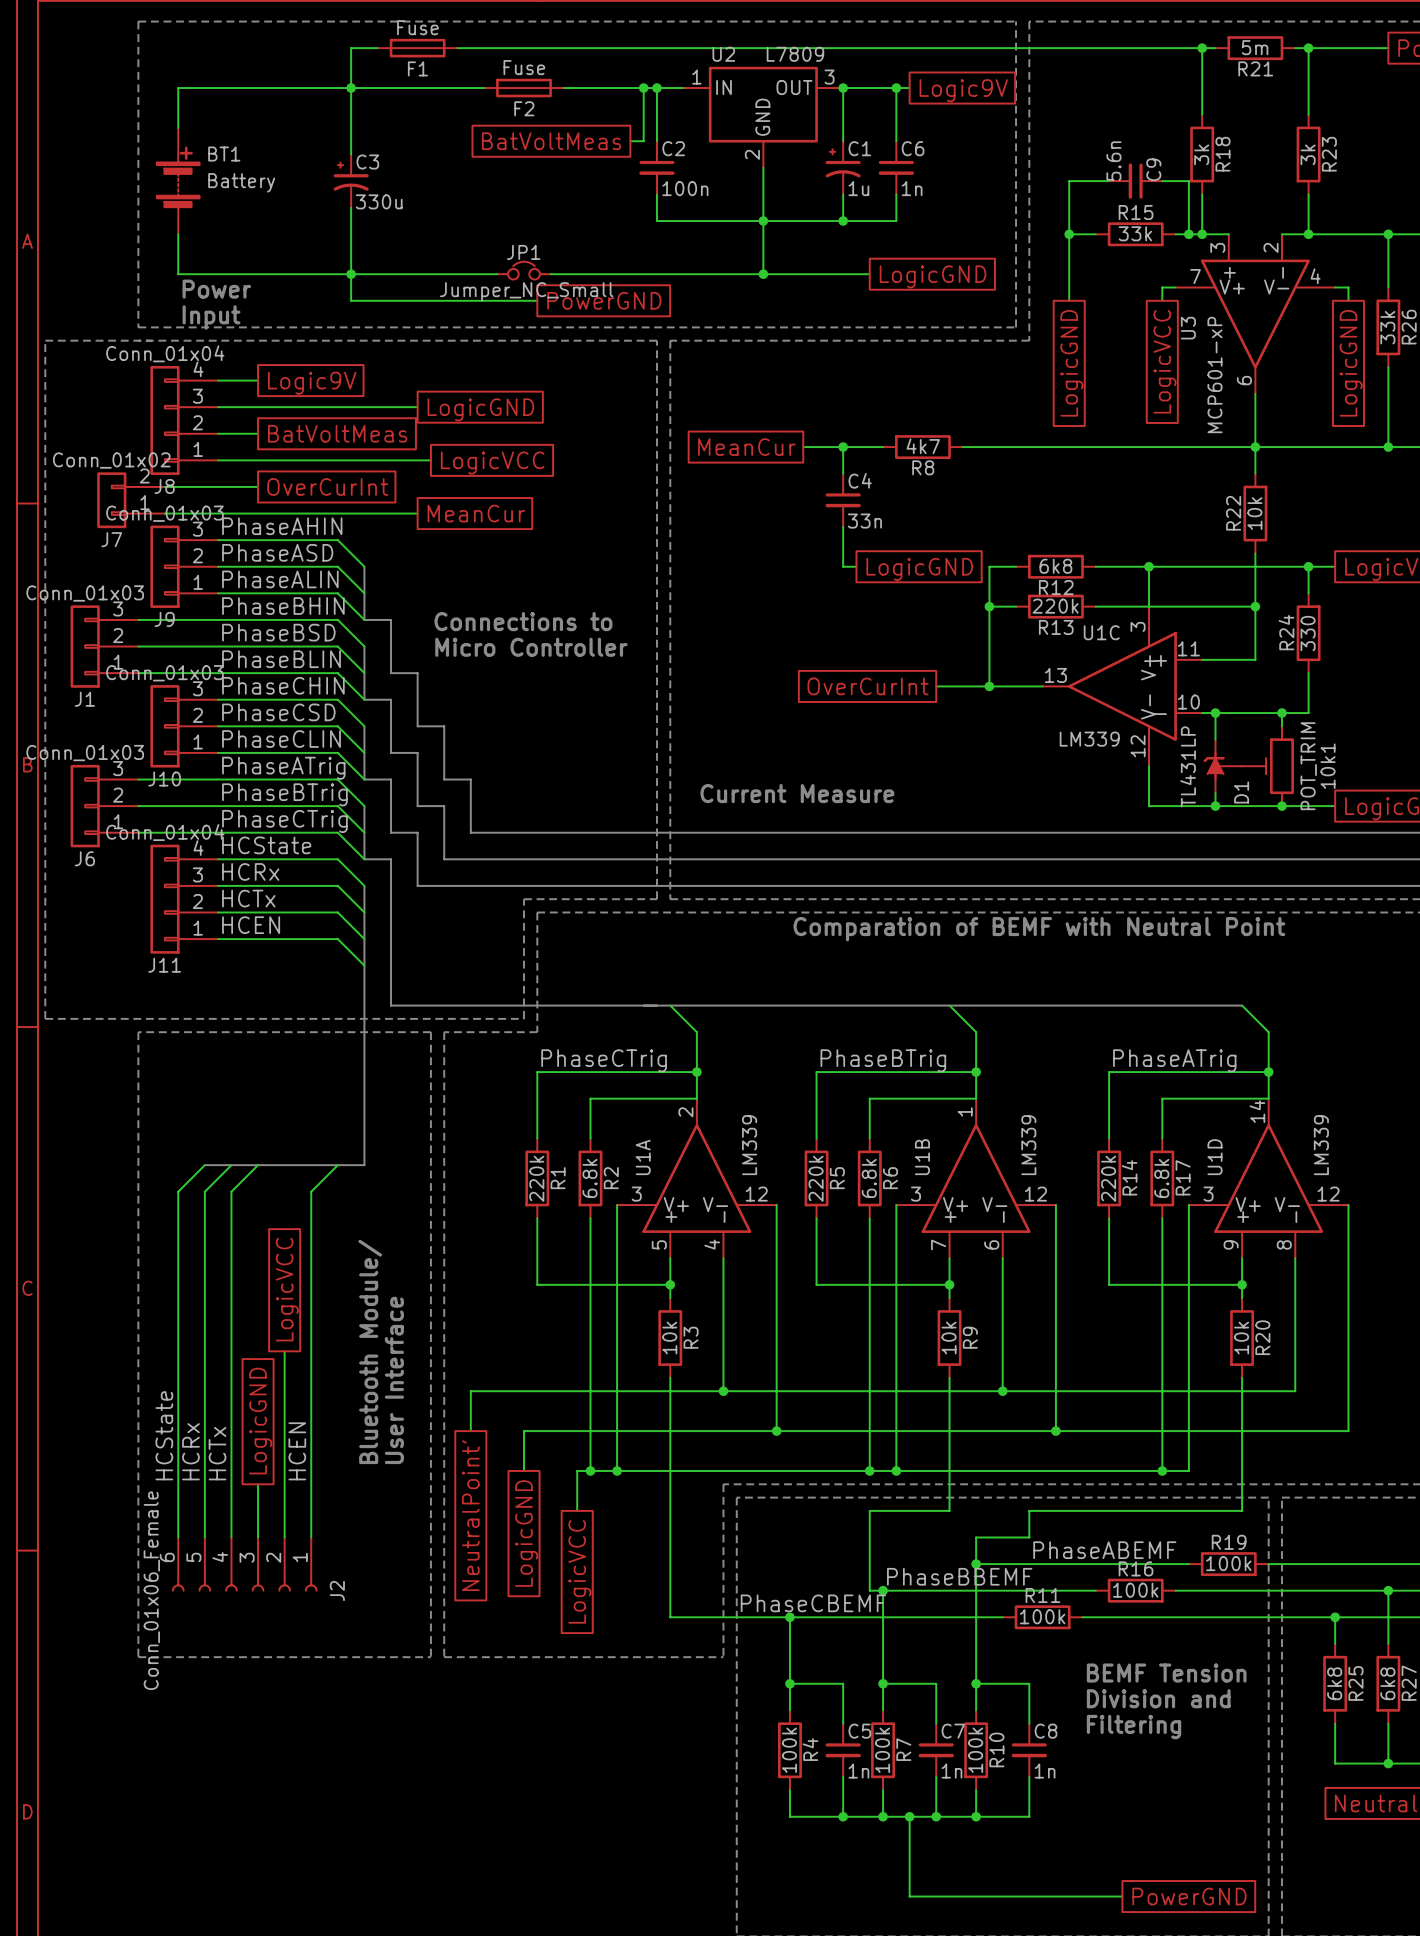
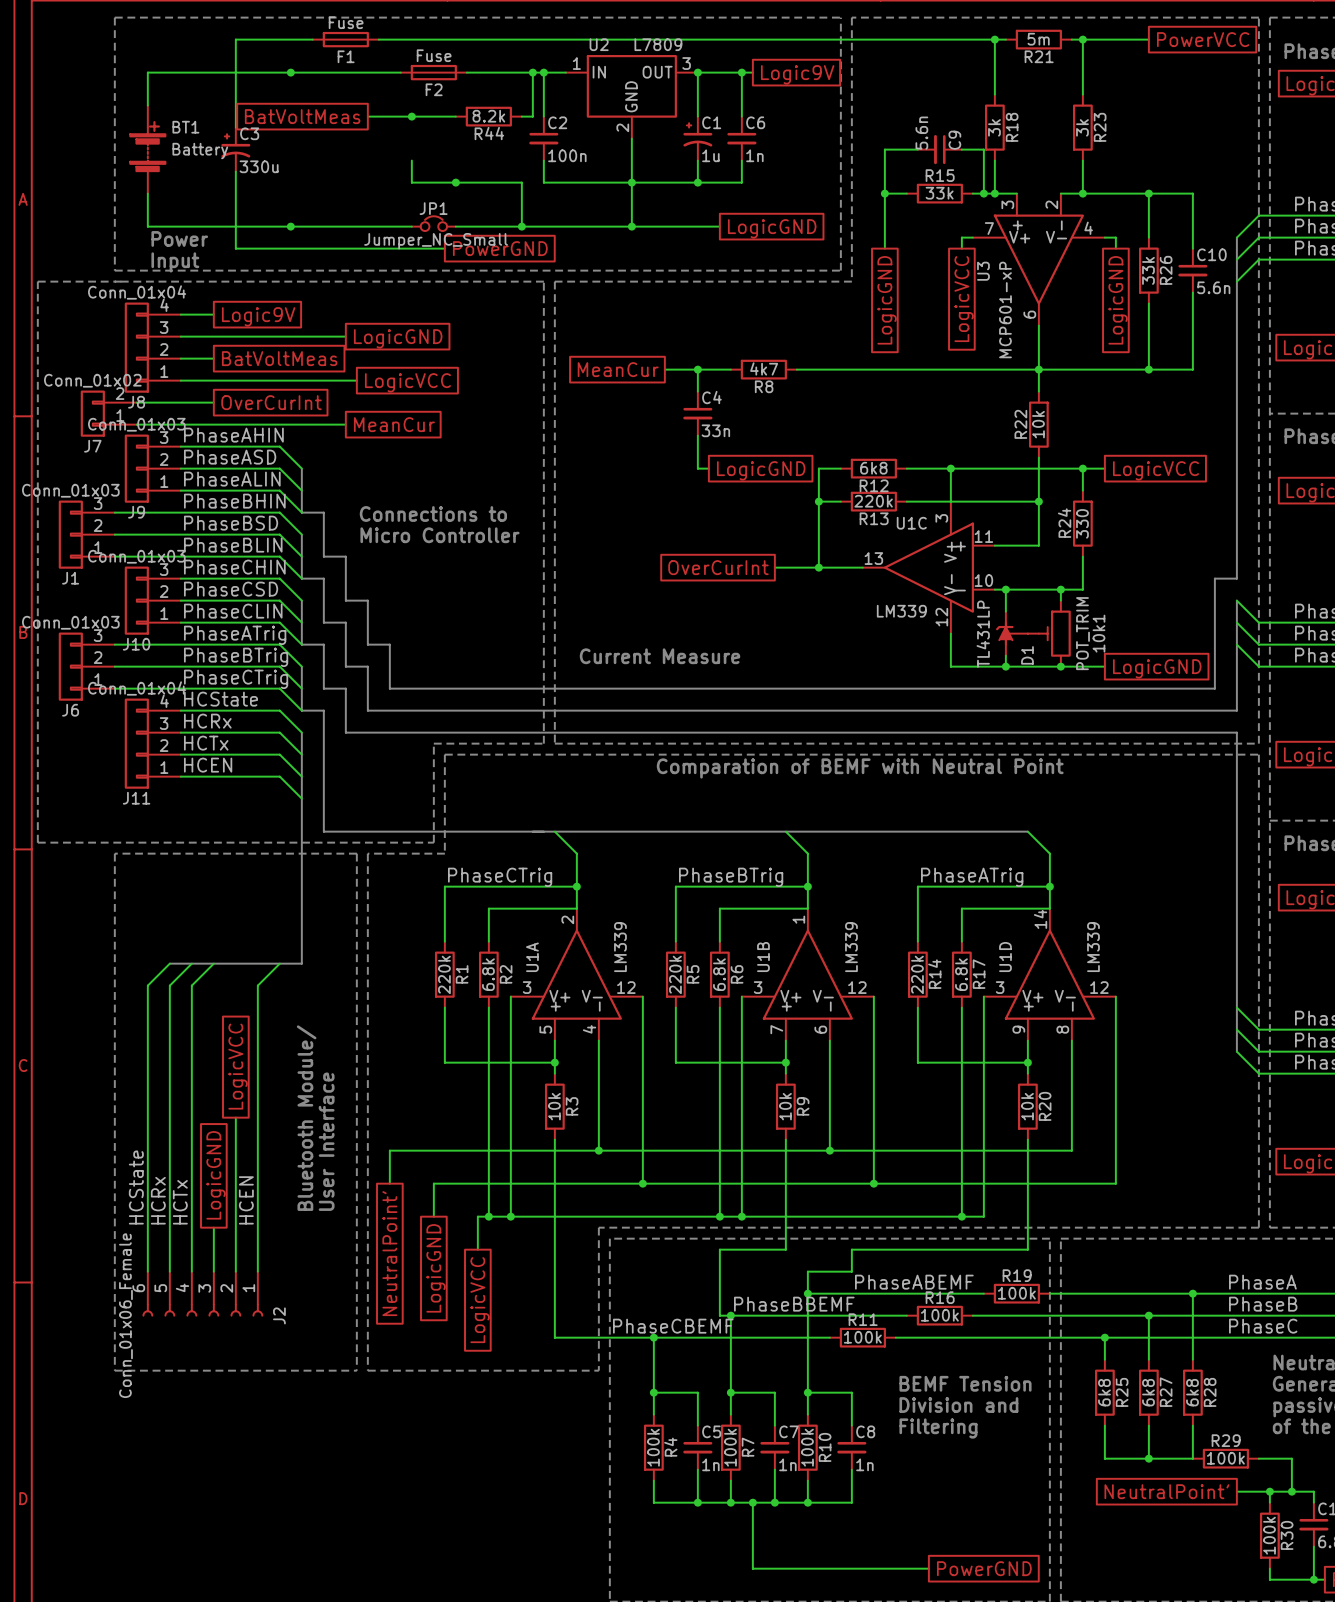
wire: (351, 48) (351, 154) -> (290, 39) (235, 39) (235, 127)
wire: none -> (367, 116) (455, 116)
junction: none -> (411, 116)
global label position: BatVoltMeas (551, 141) -> BatVoltMeas (302, 116)
R44: none -> 8.2k (488, 116)
C3 position: (351, 181) -> (235, 149)
wire: none -> (411, 160) (411, 182) (521, 182) (521, 226)
wire: (351, 207) (351, 300) -> (235, 171) (235, 248) (290, 248)
junction: none -> (455, 182)
junction: none -> (521, 226)

